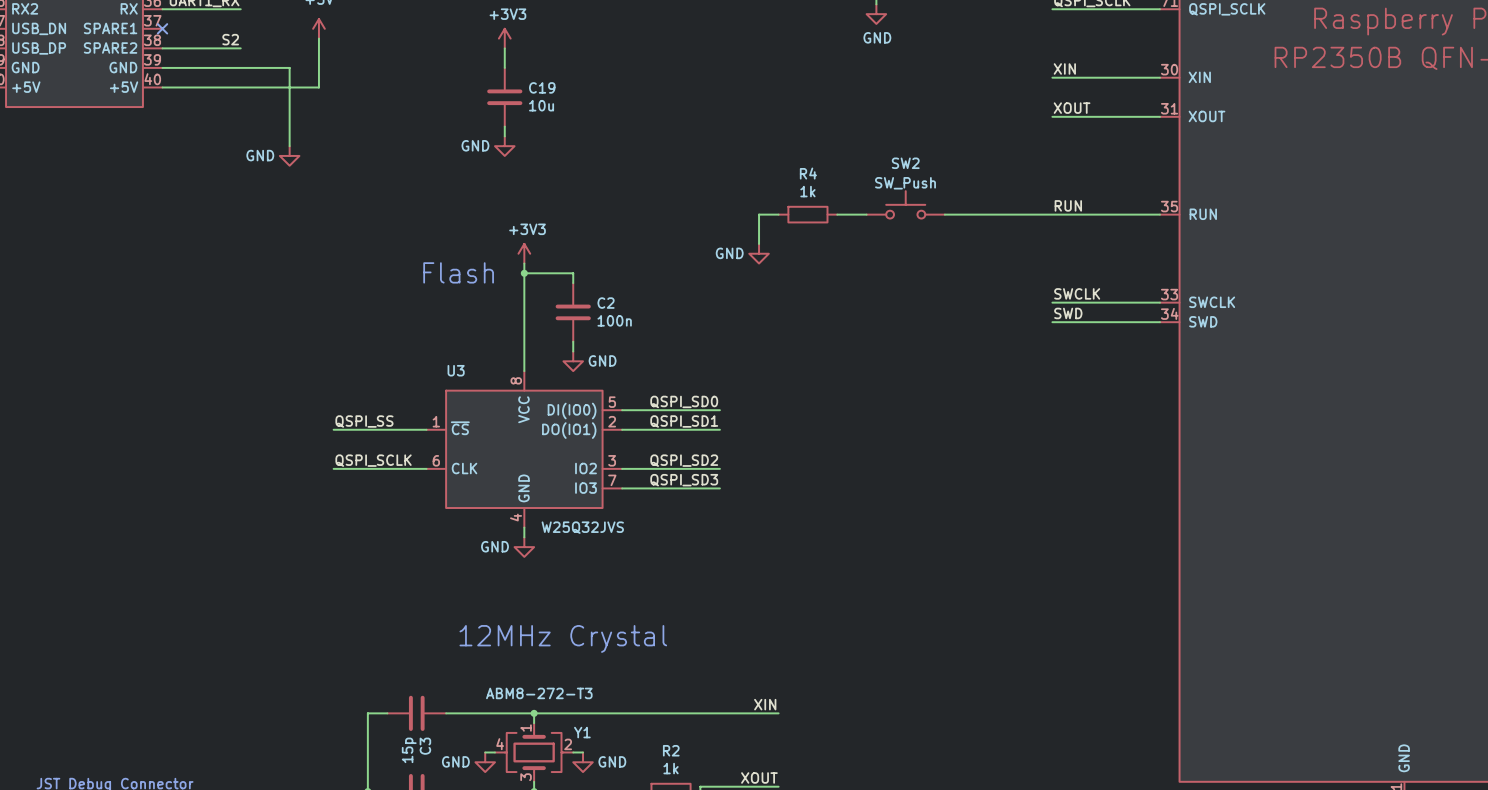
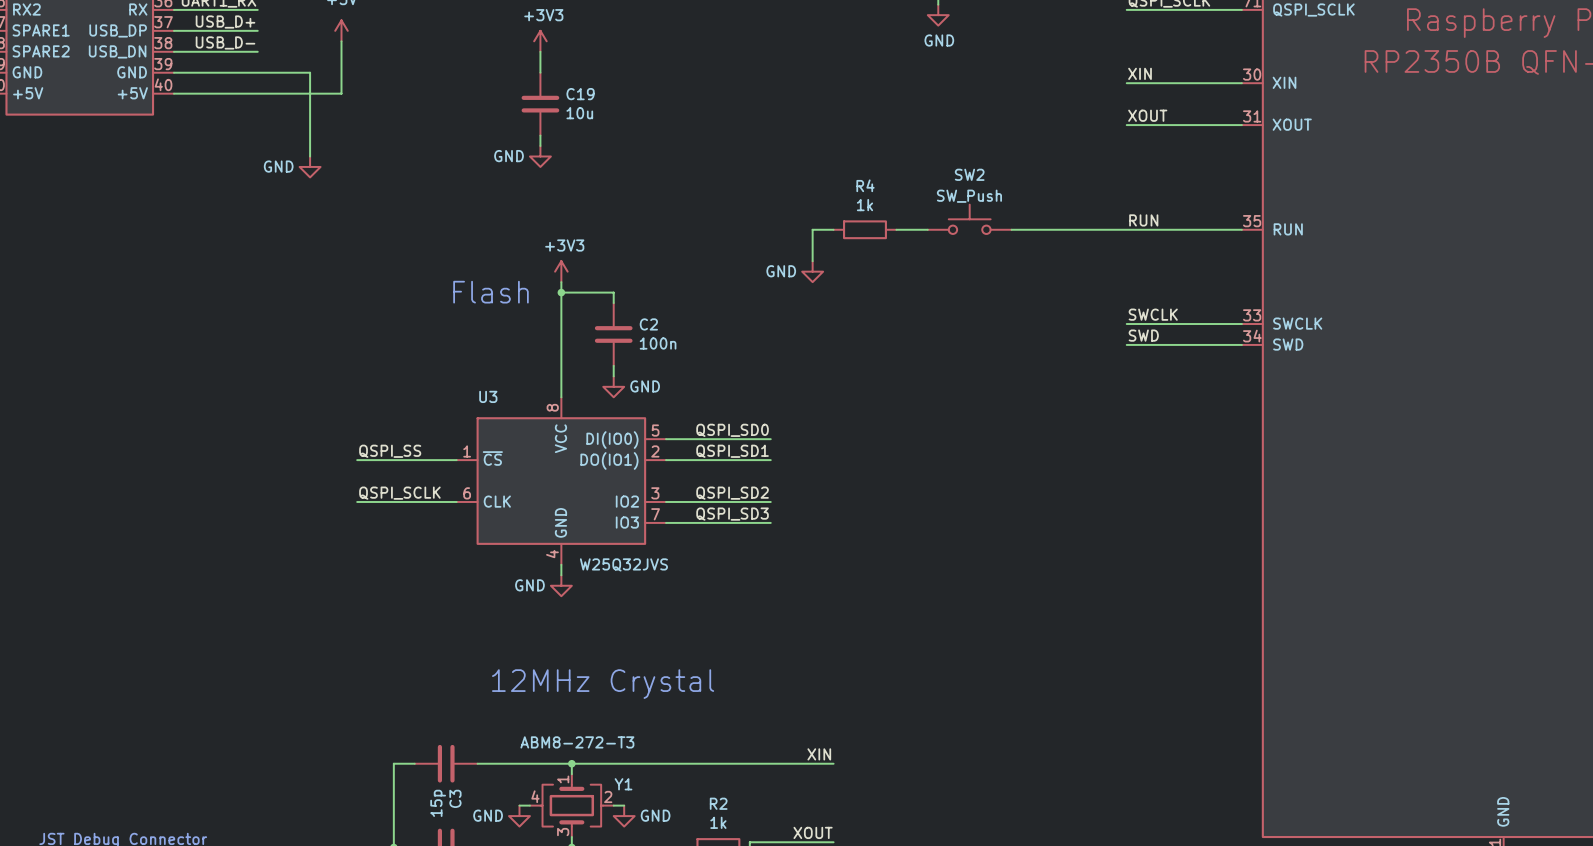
label: none -> USB_D+ (225, 22)
part pin name: USB_DN (39, 28) -> SPARE1 (41, 30)
part pin name: SPARE1 (110, 28) -> USB_DP (118, 30)
wire: none -> (173, 30) (257, 30)
no-connect mark: (162, 28) -> none
label: S2 (230, 39) -> USB_D- (225, 42)
part pin name: USB_DP (39, 48) -> SPARE2 (41, 51)
part pin name: SPARE2 (110, 48) -> USB_DN (117, 51)

